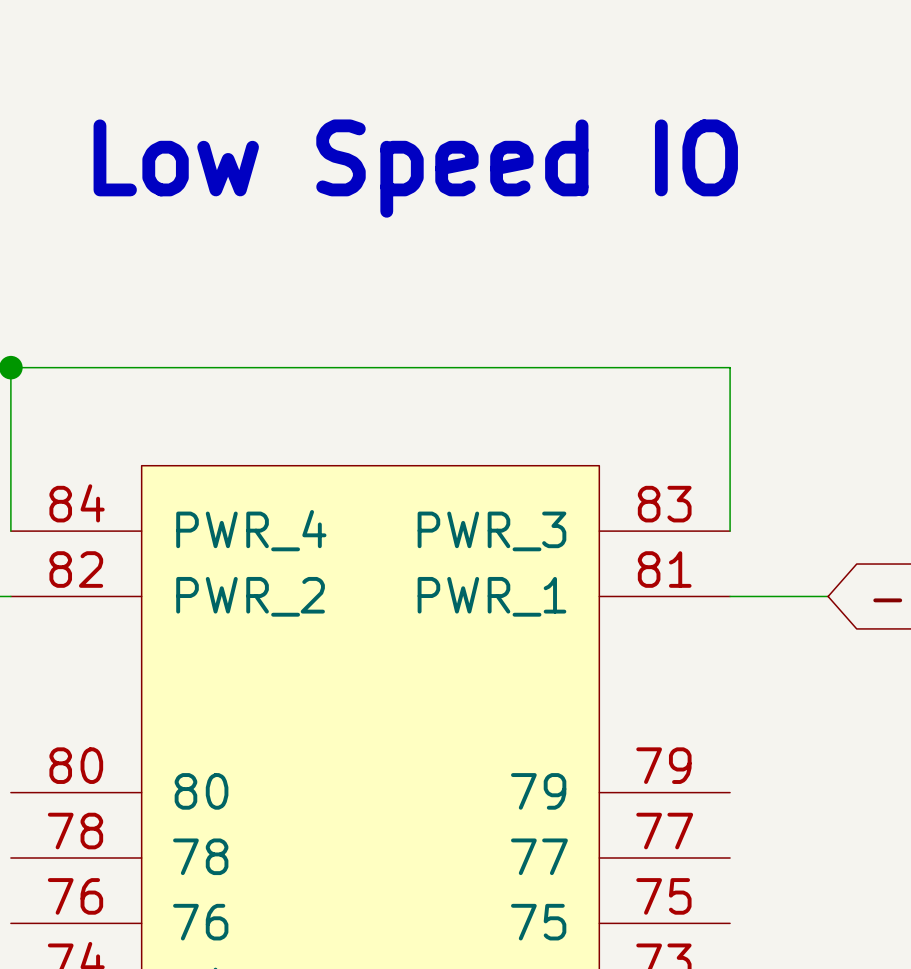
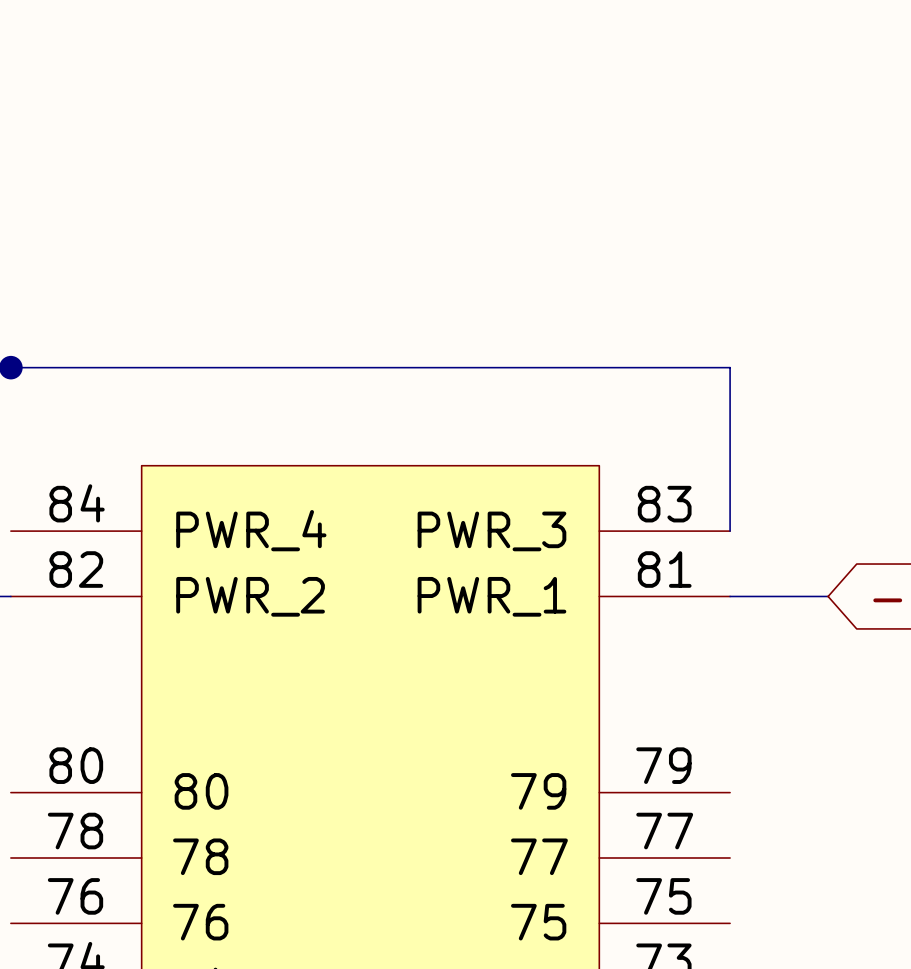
text: Low Speed IO (415, 168) -> none
wire: (10, 367) (10, 531) -> none

